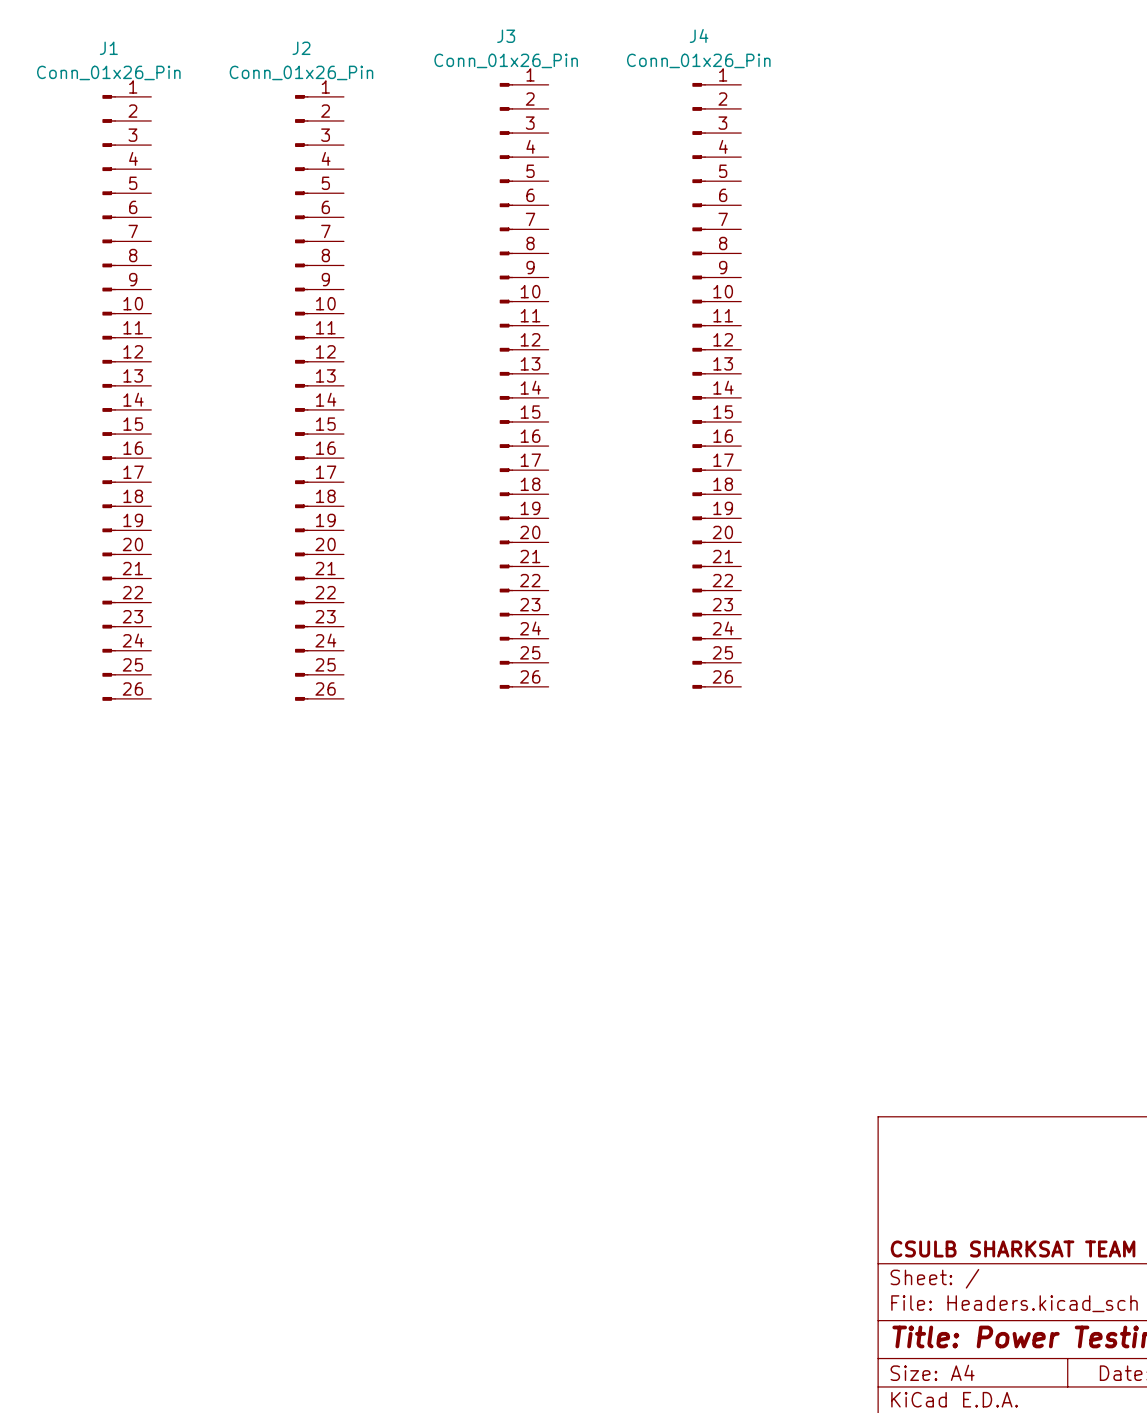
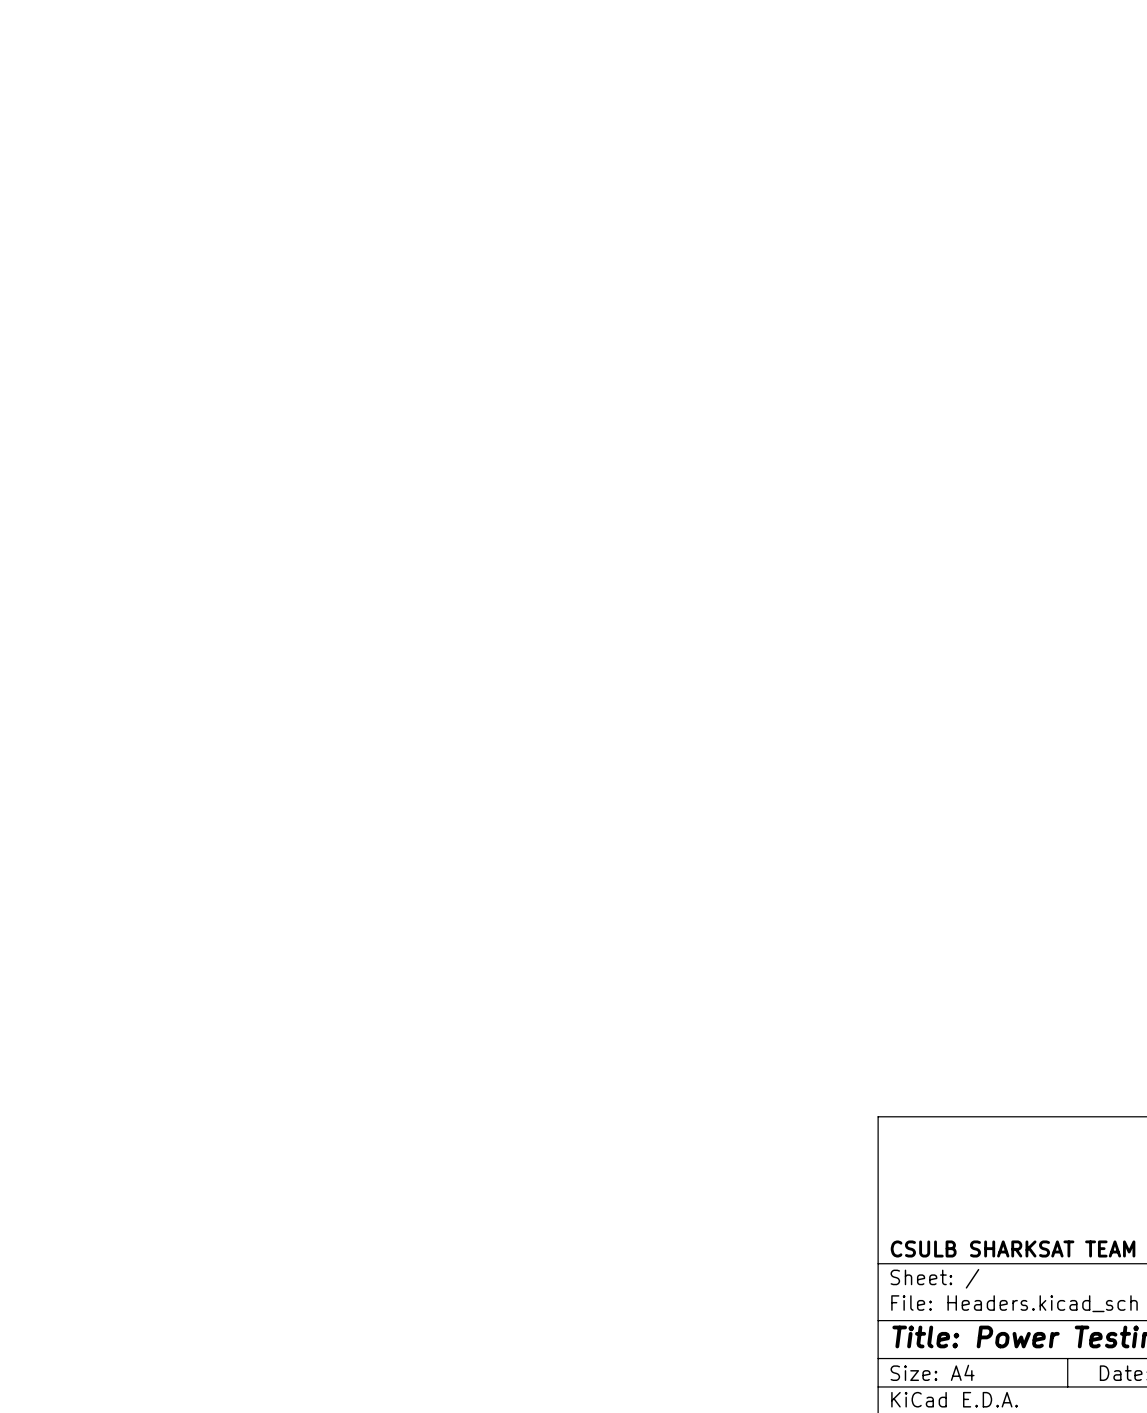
J3: Conn_01x26_Pin (524, 385) -> none
J4: Conn_01x26_Pin (716, 385) -> none
J1: Conn_01x26_Pin (126, 397) -> none
J2: Conn_01x26_Pin (319, 397) -> none

